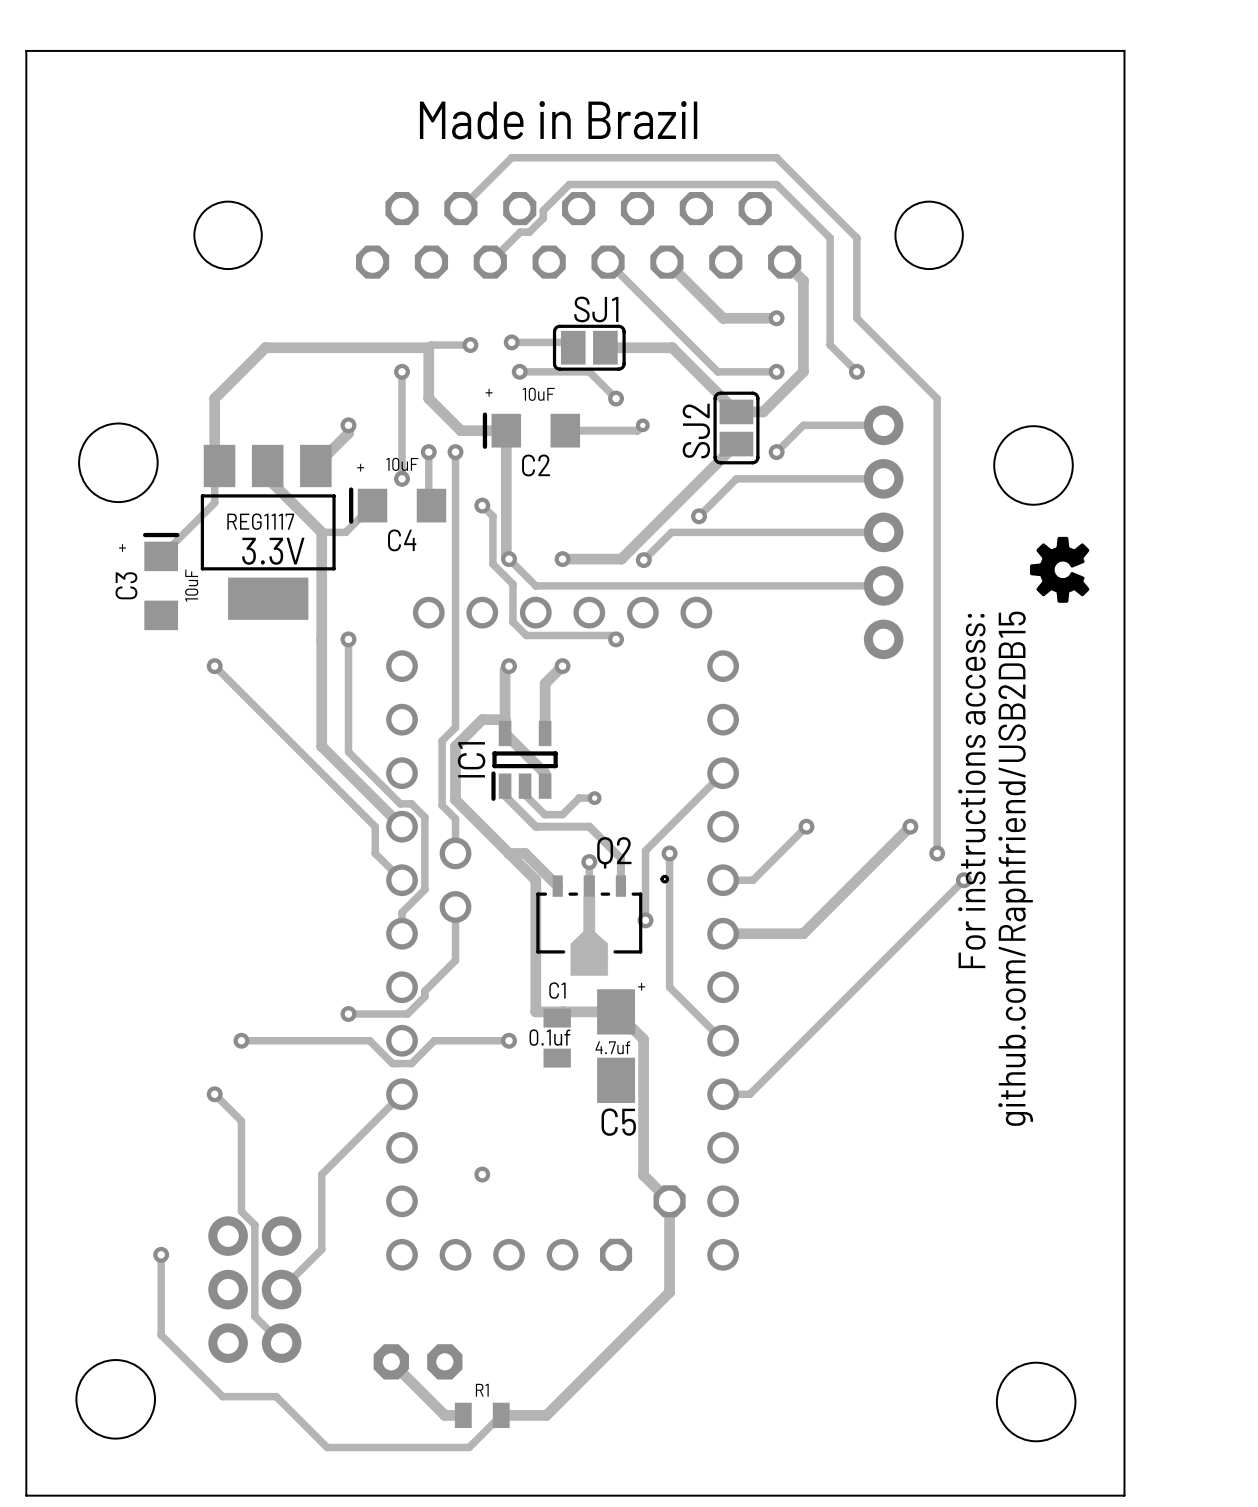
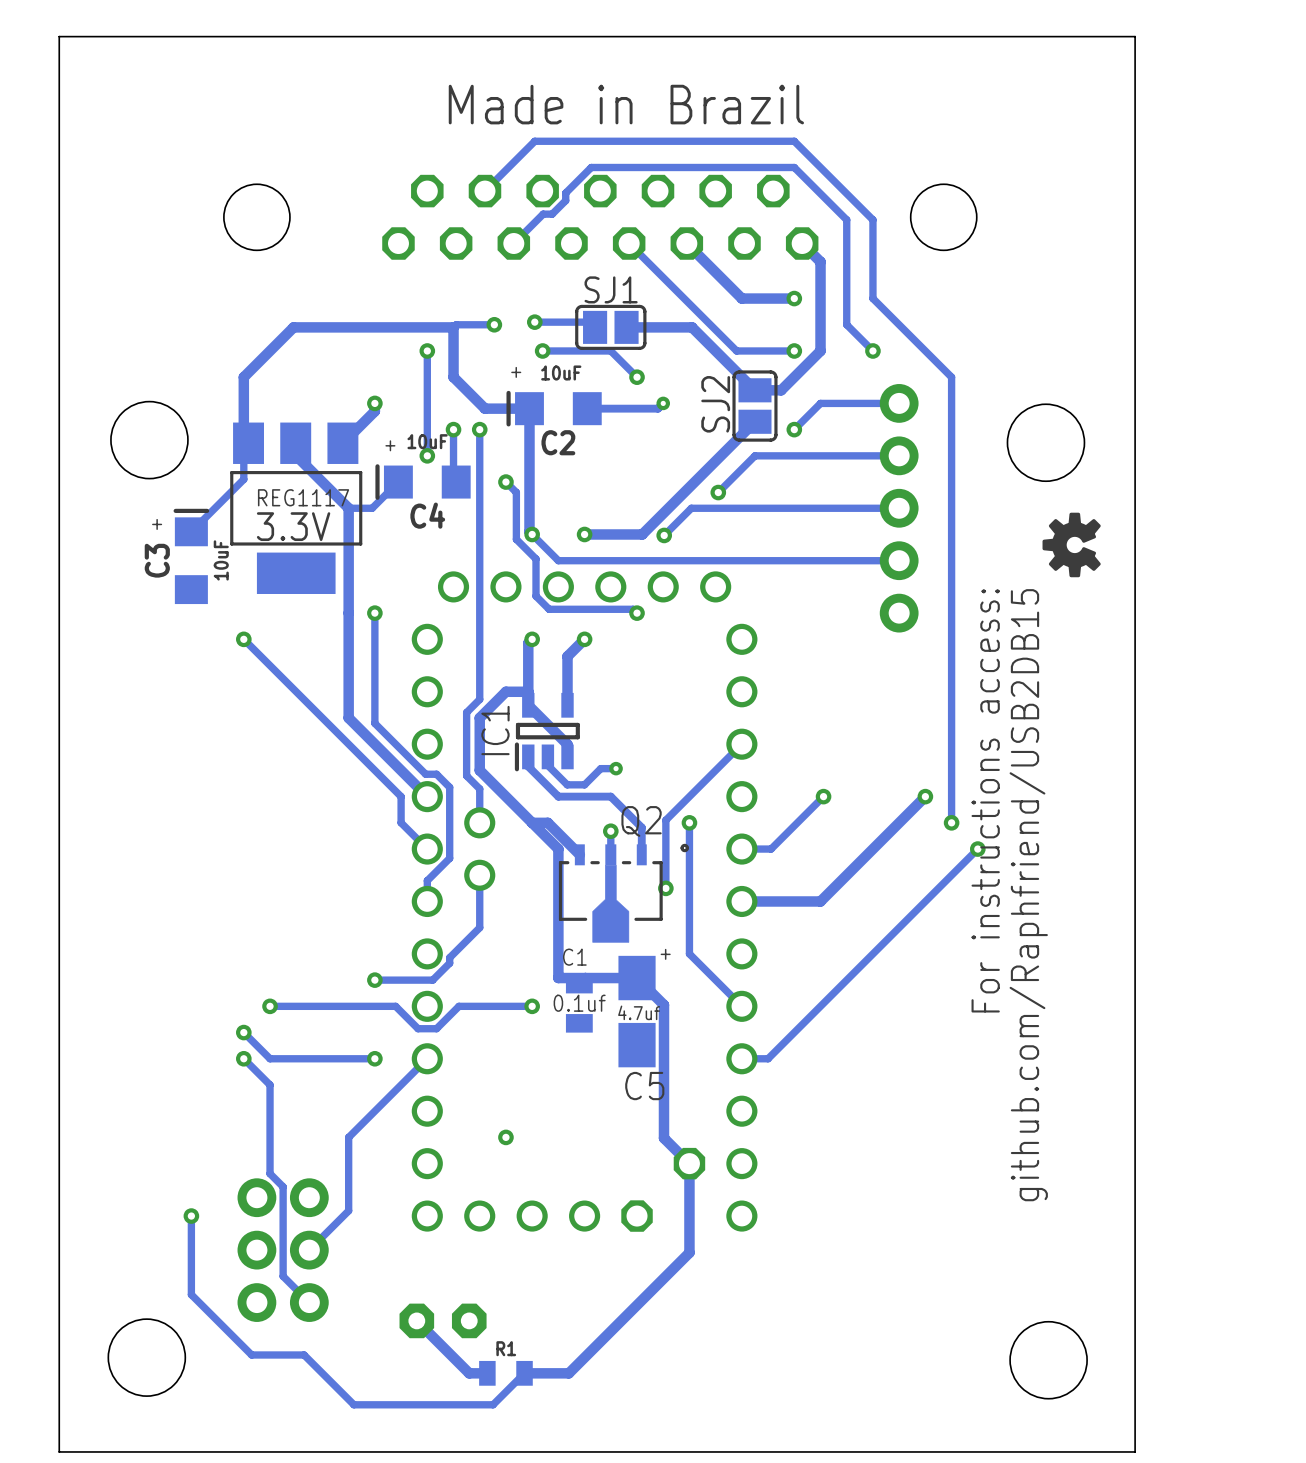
track: none -> (243, 1032) (270, 1058) (374, 1058)
via: none -> (243, 1032)
via: none -> (374, 1058)

